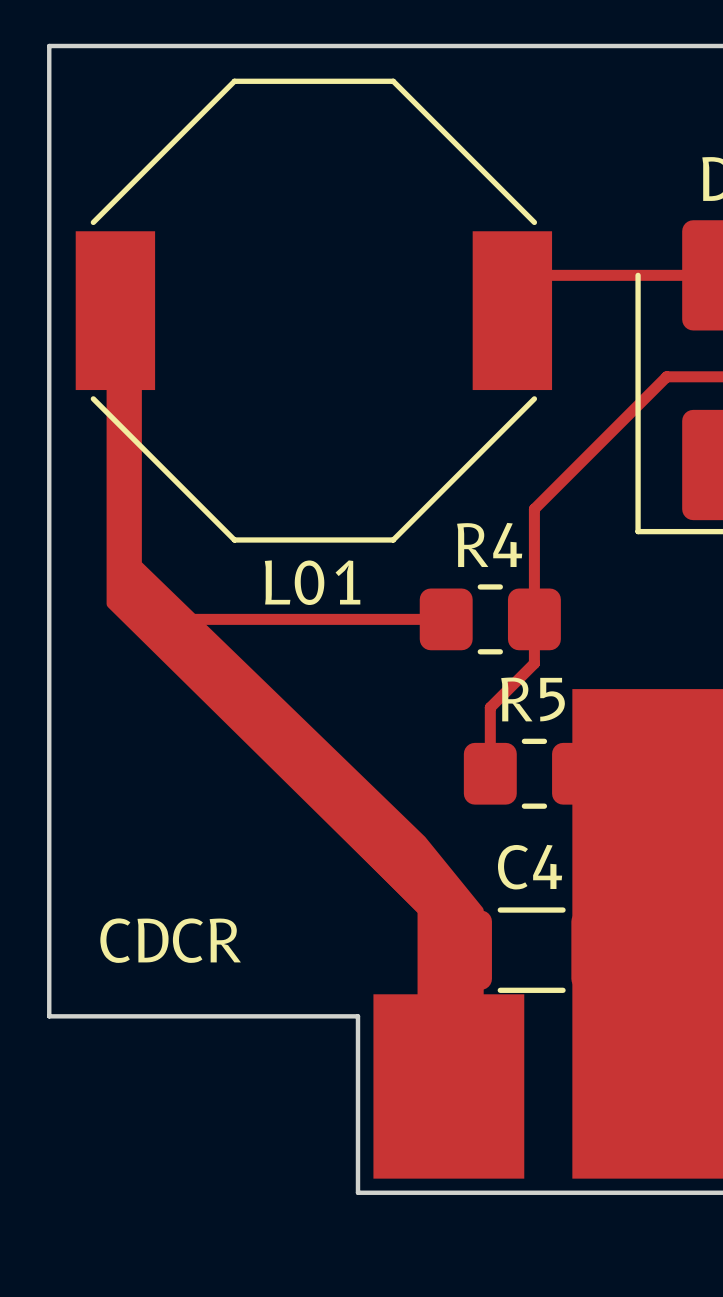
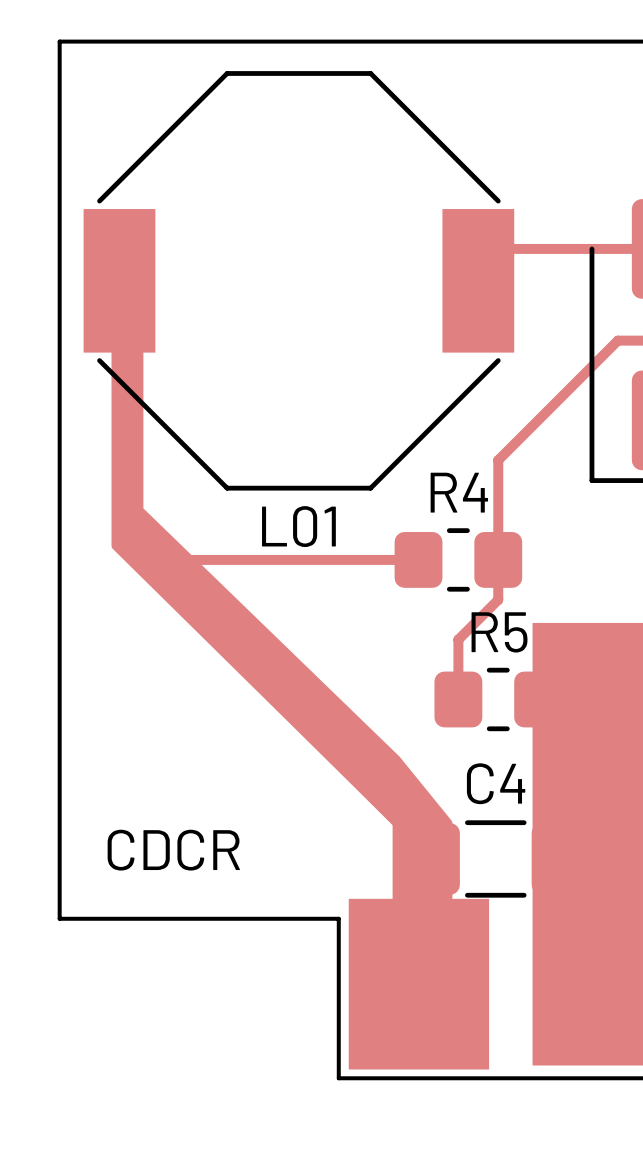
drawing shape: [373, 994, 525, 1179] -> [348, 898, 490, 1070]

